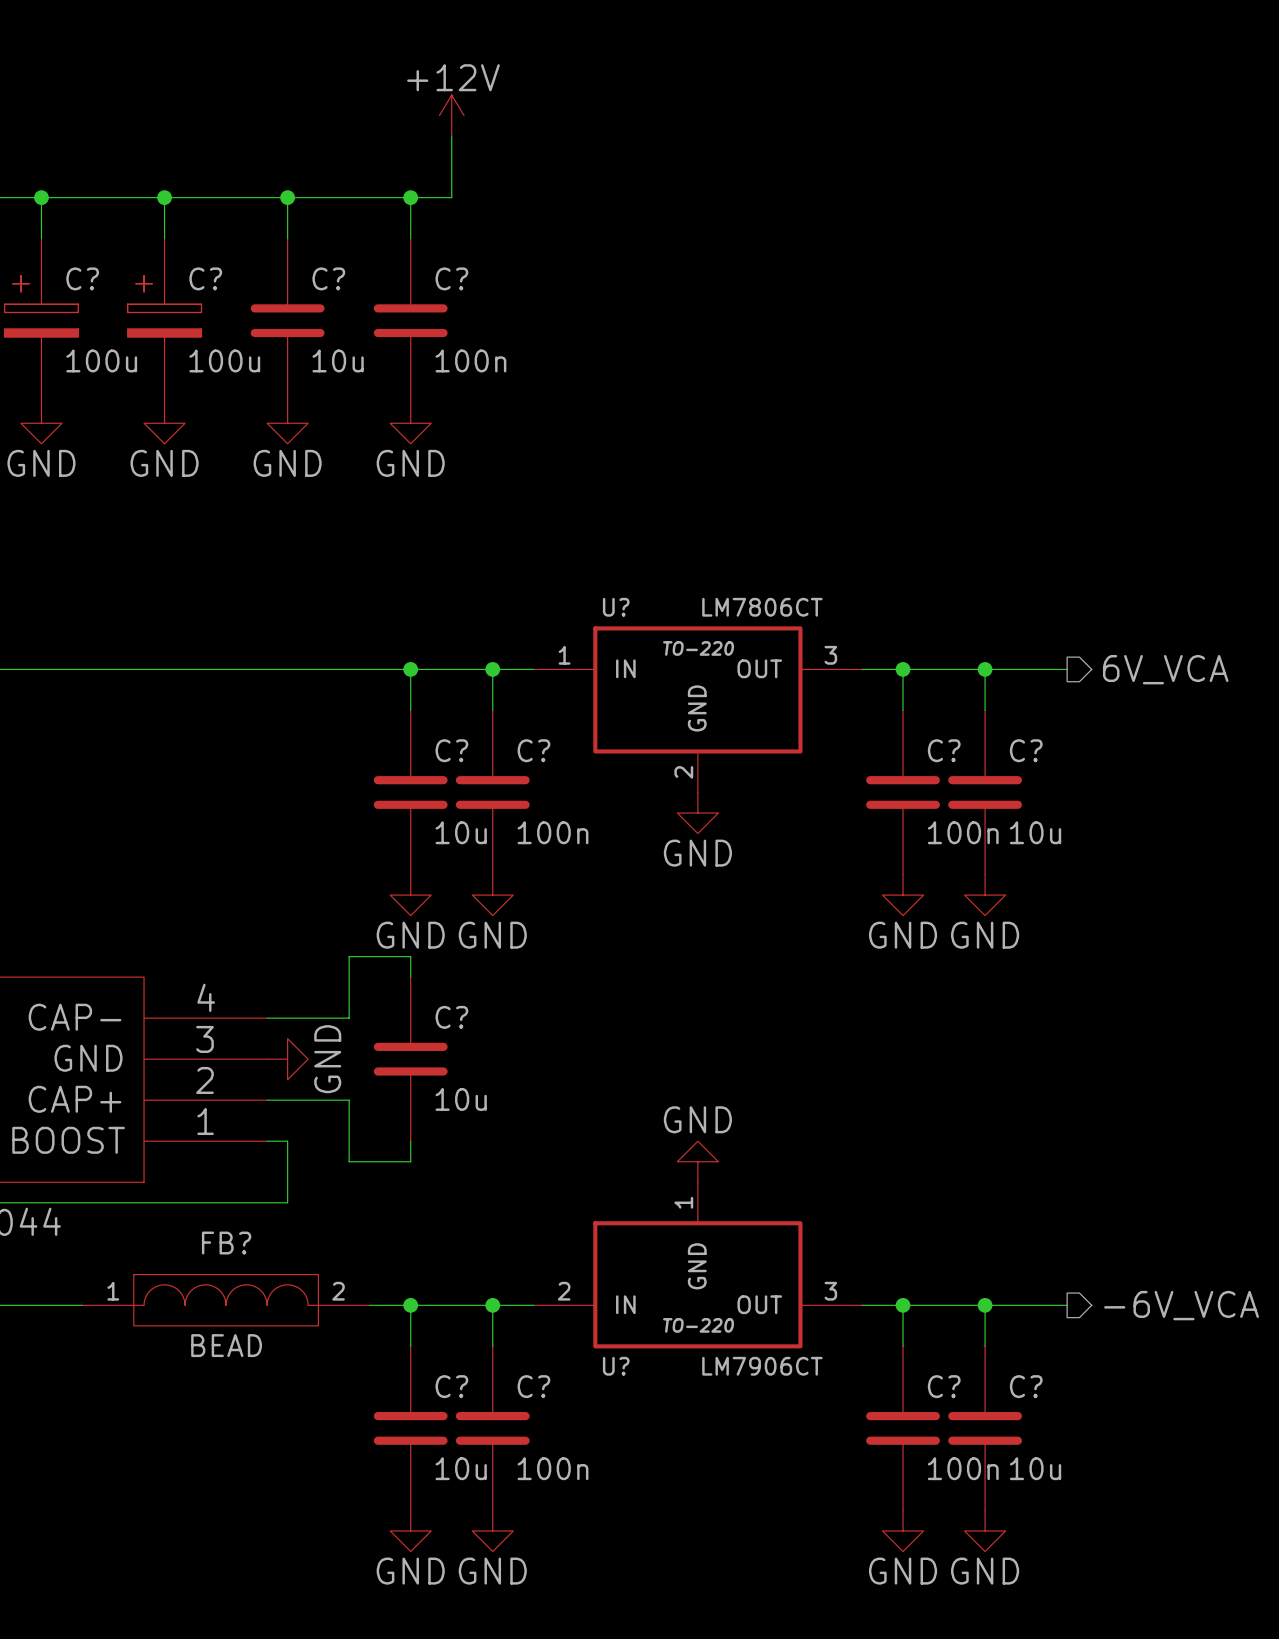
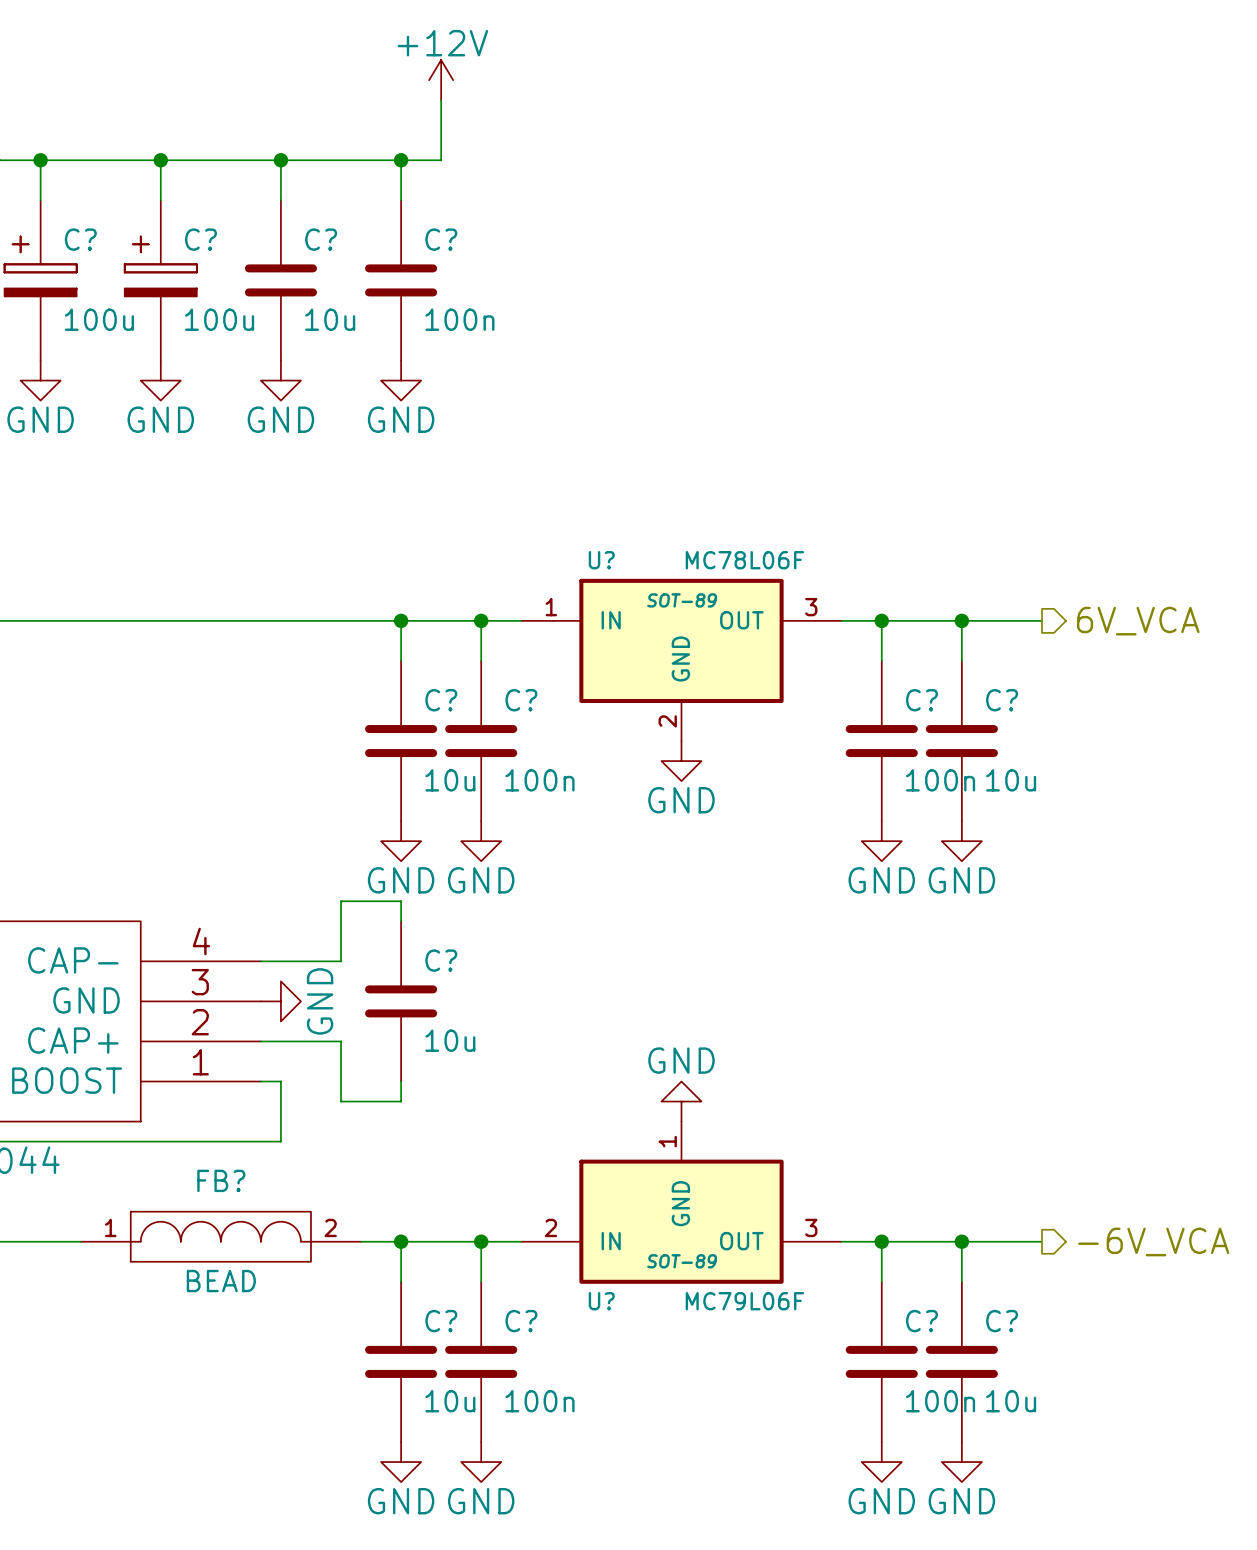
U? value: LM7806CT (762, 607) -> MC78L06F (744, 560)
U? text: TO-220 (698, 648) -> SOT-89 (682, 600)
U? text: TO-220 (698, 1325) -> SOT-89 (682, 1261)
U? value: LM7906CT (762, 1366) -> MC79L06F (744, 1301)

